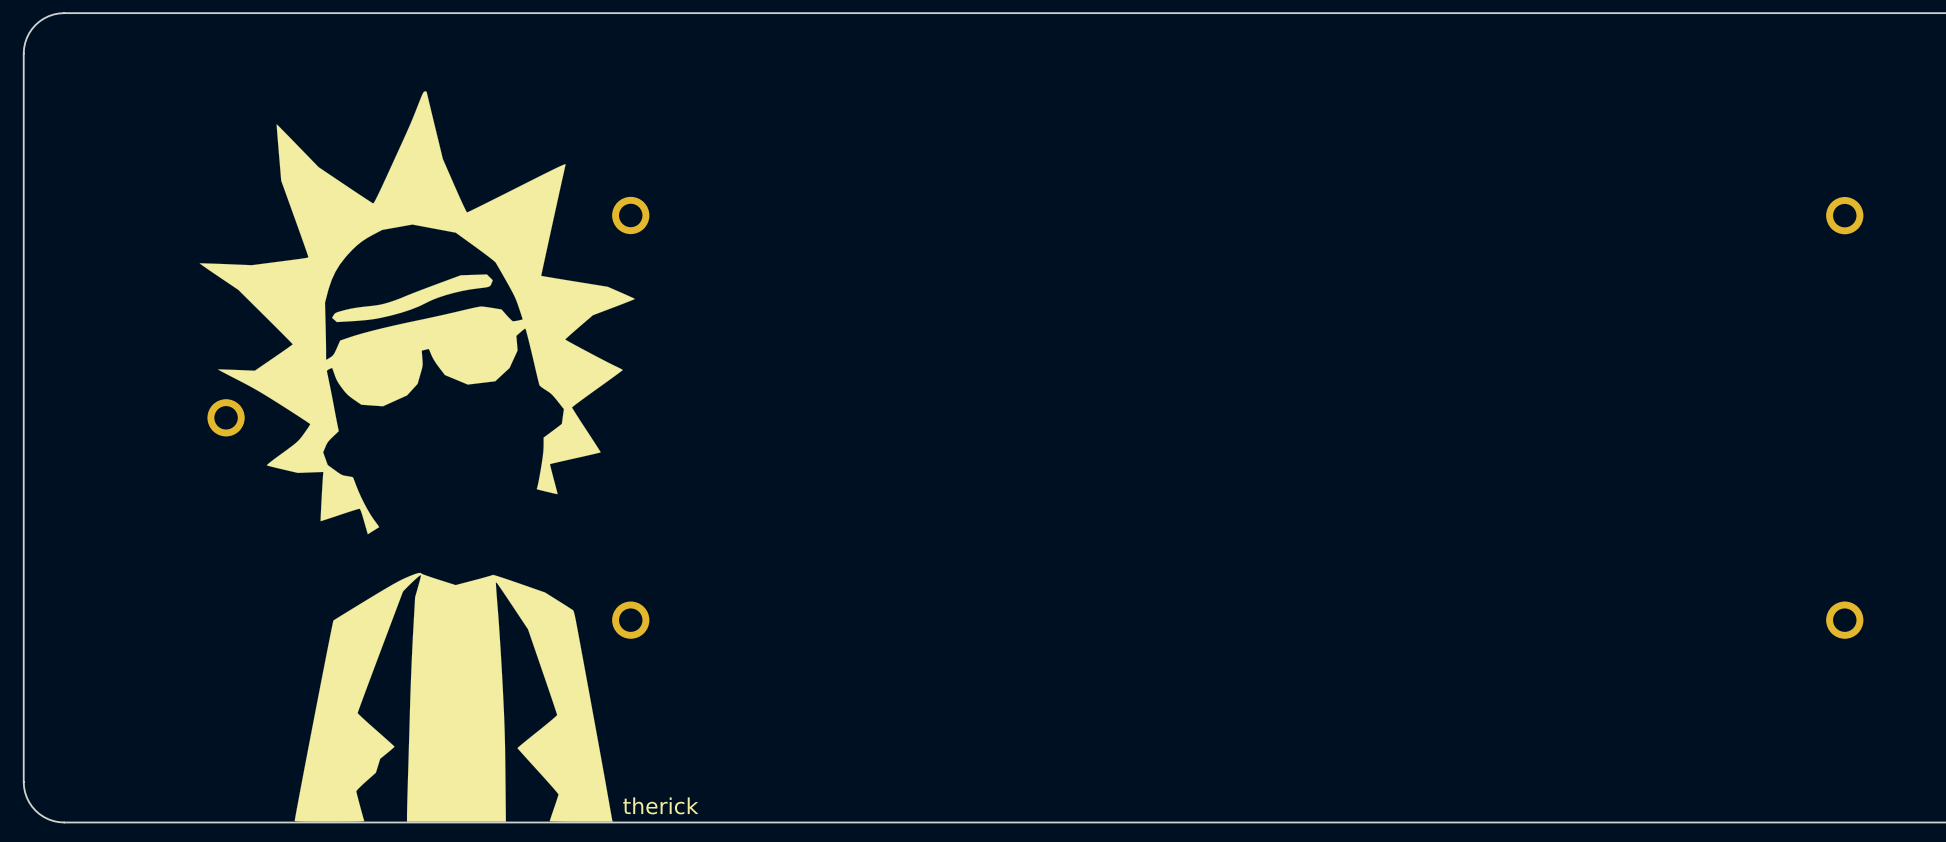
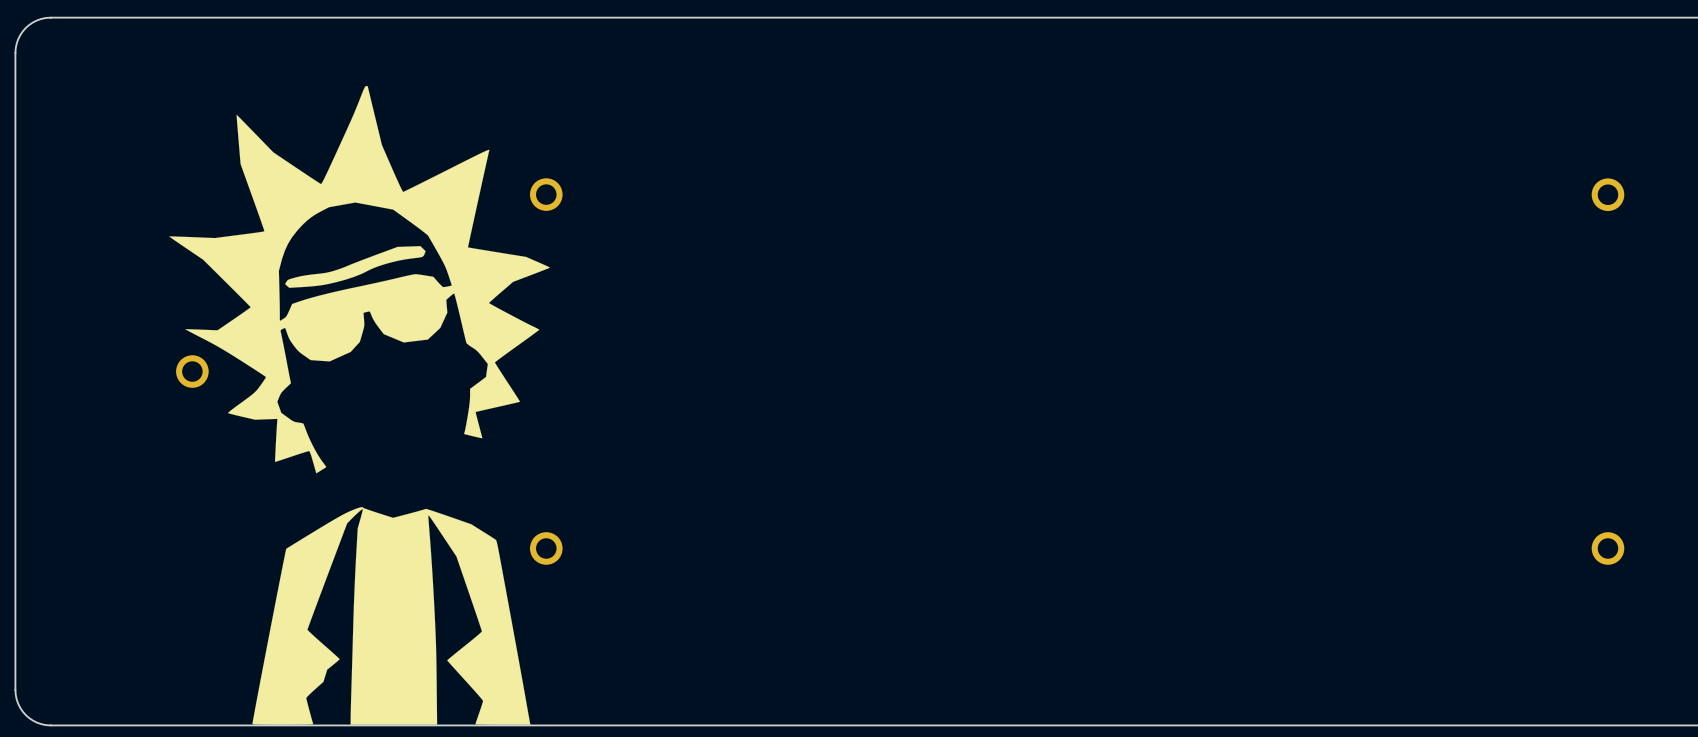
text: therick (660, 805) -> none

